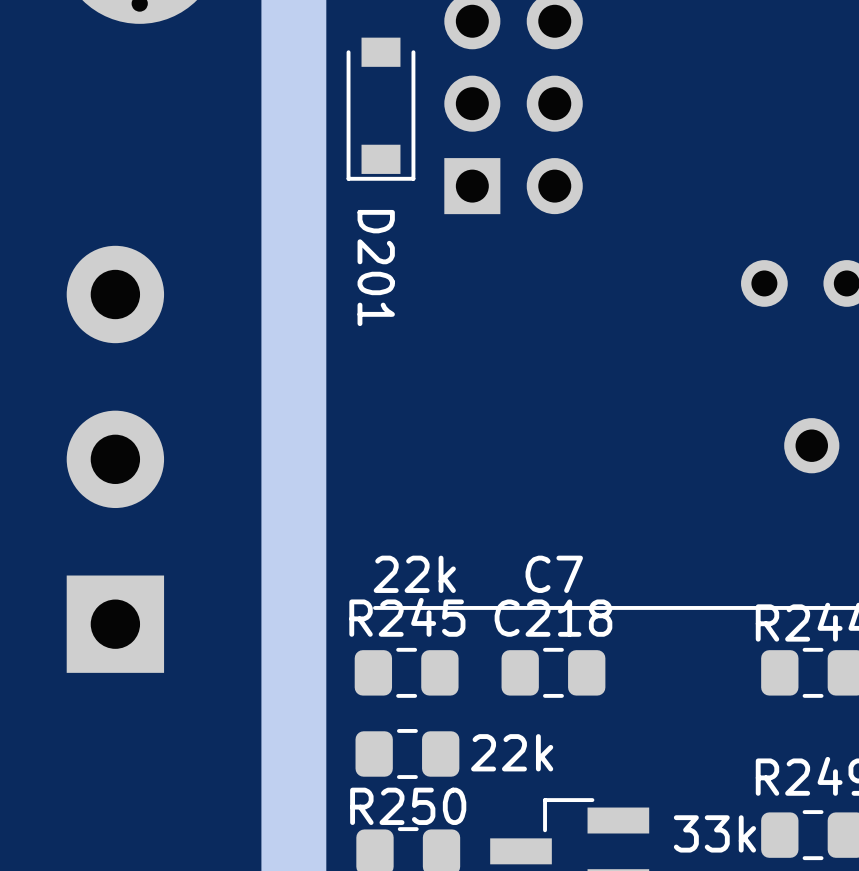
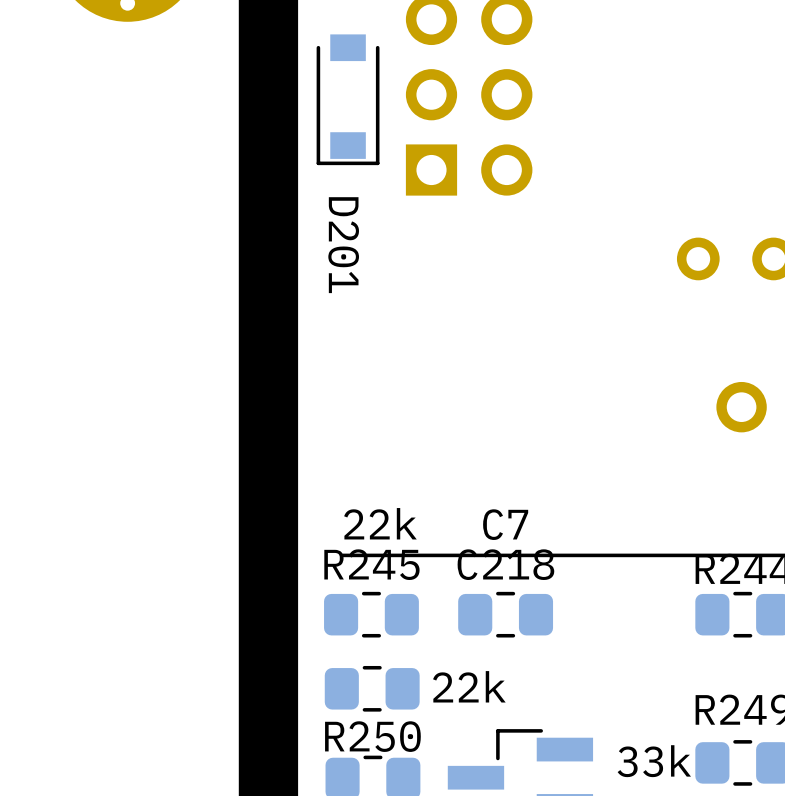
part: (115, 459) -> none

